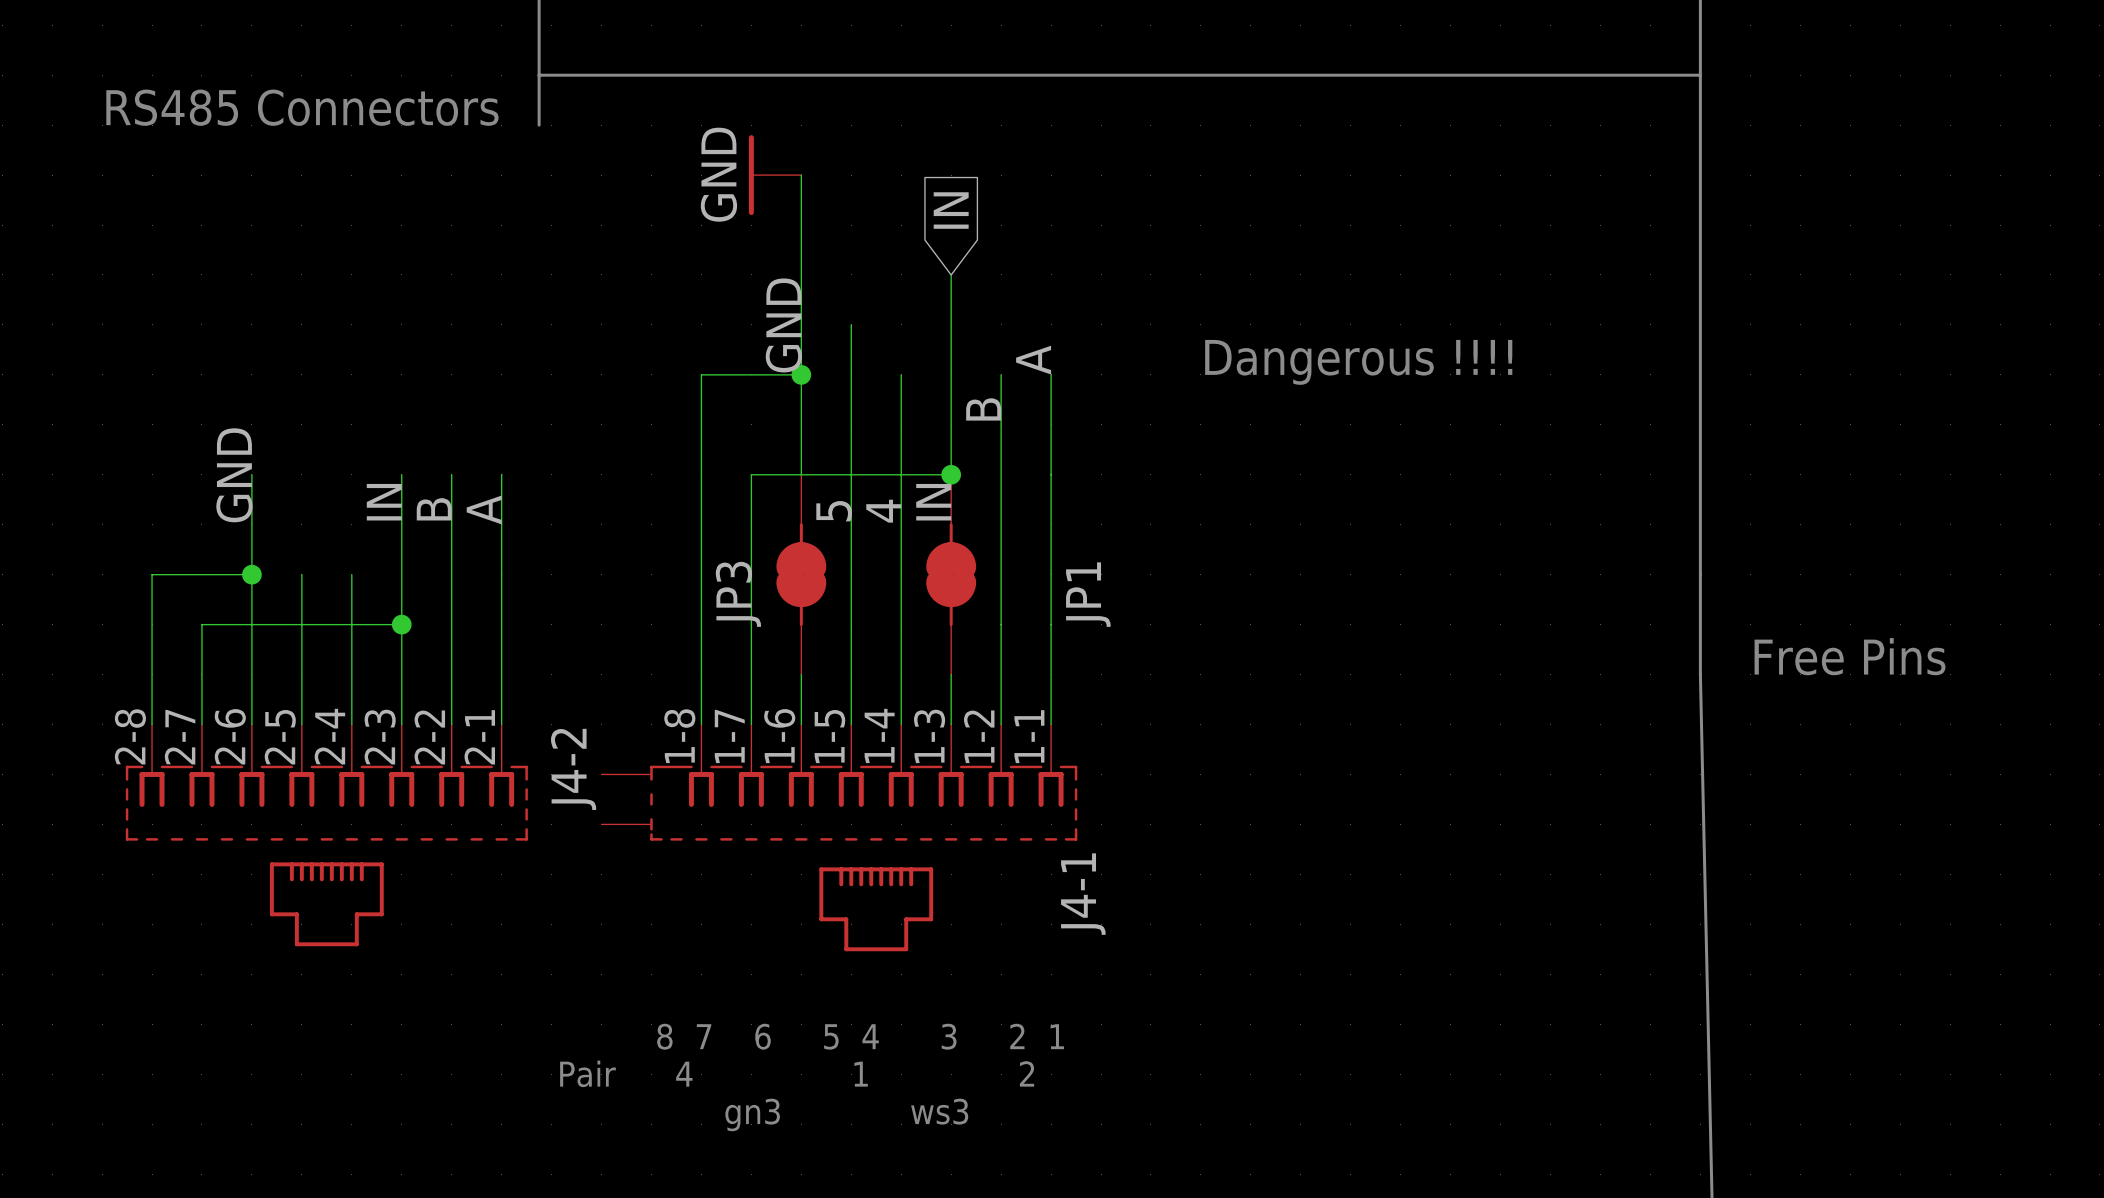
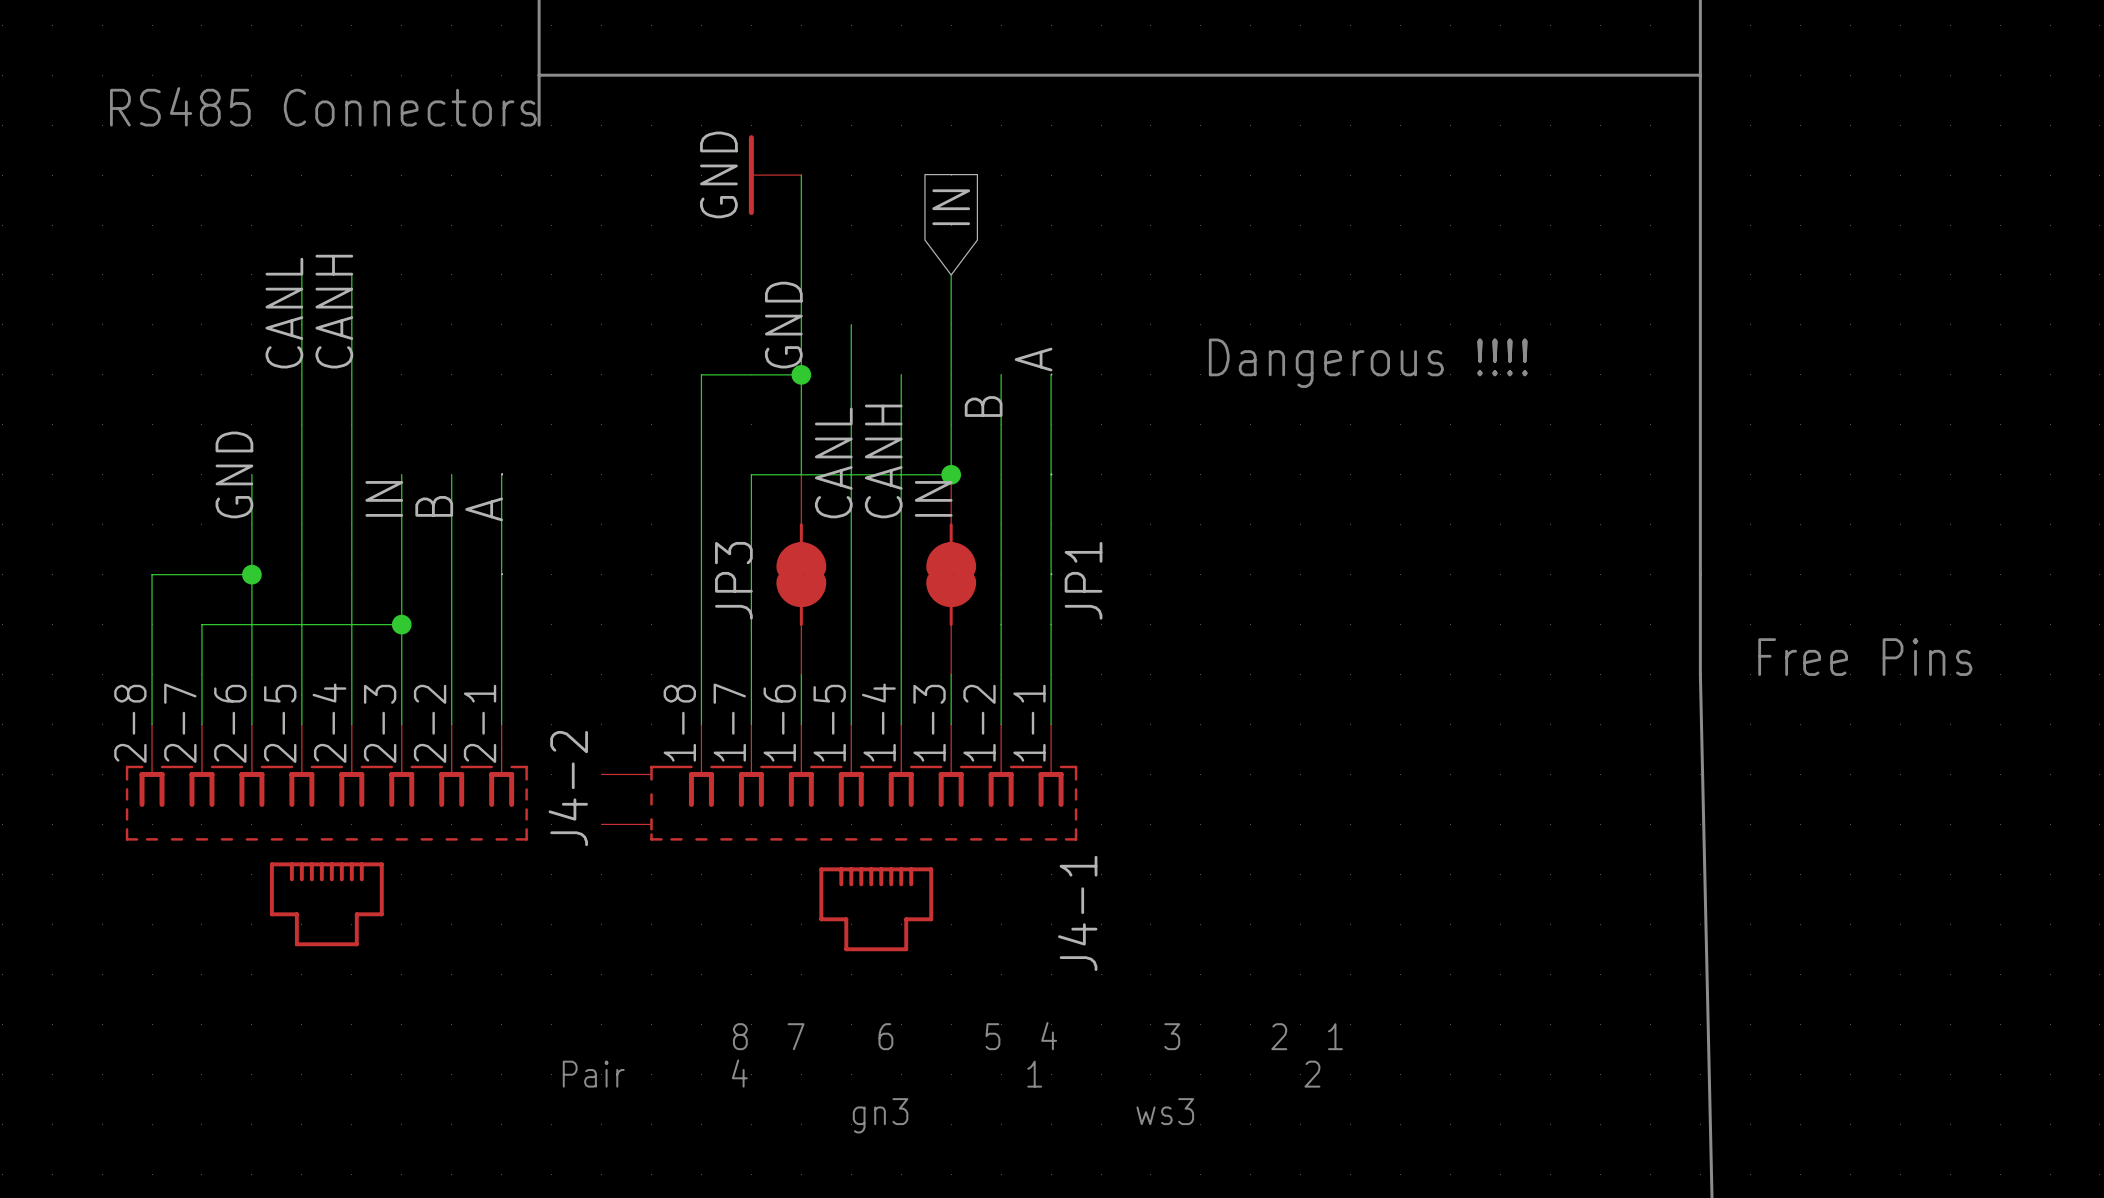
wire: none -> (301, 274) (301, 574)
wire: none -> (351, 274) (351, 574)
label: none -> CANH (334, 311)
label: none -> CANL (284, 313)
label: 5 (834, 511) -> CANL (833, 462)
label: 4 (883, 511) -> CANH (883, 461)

